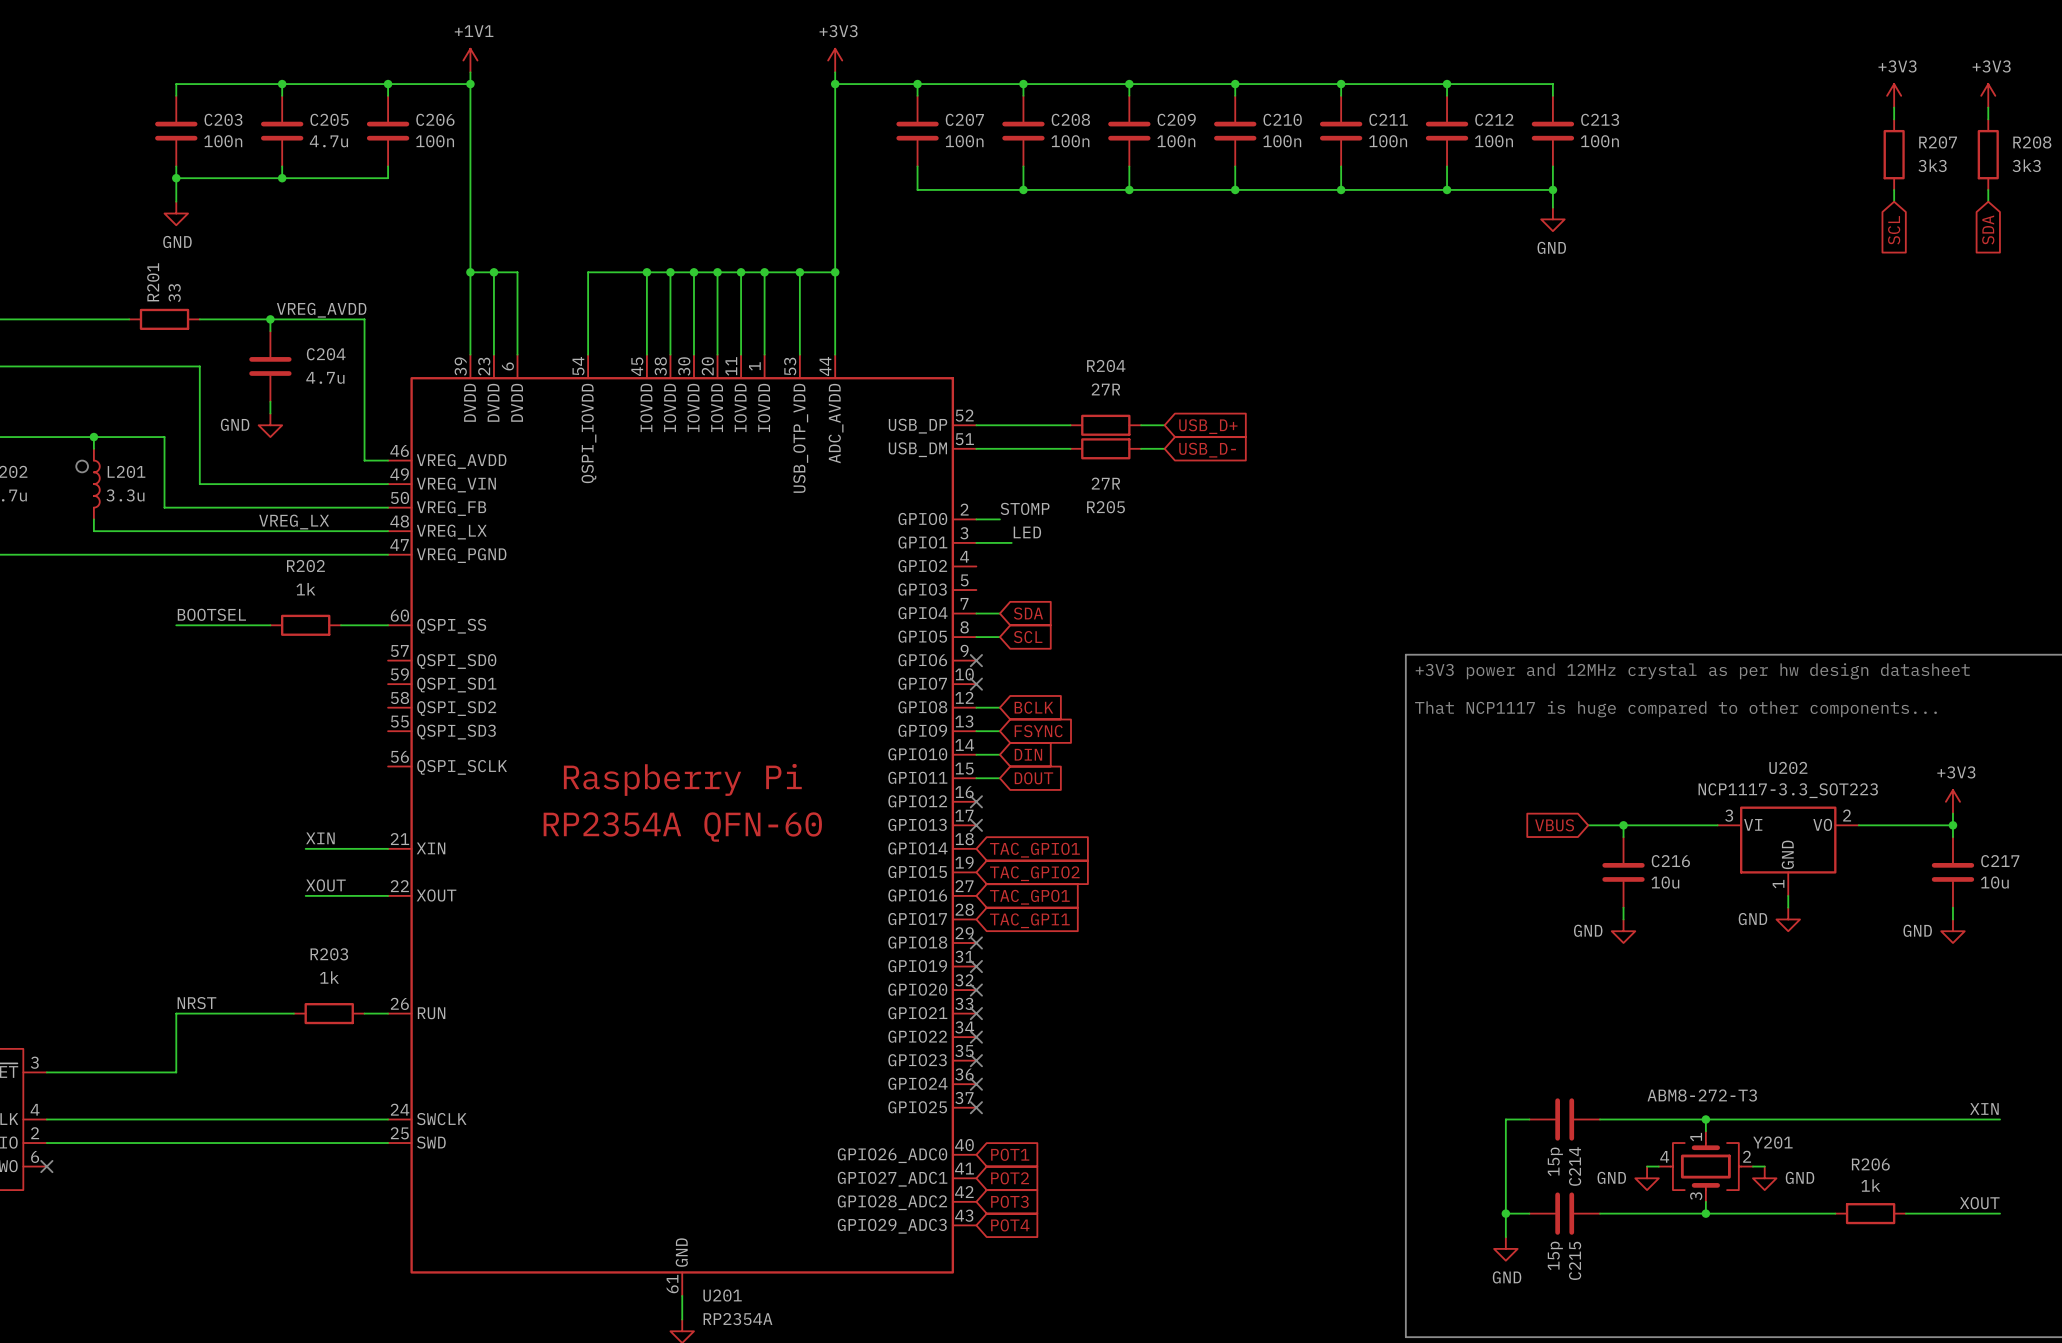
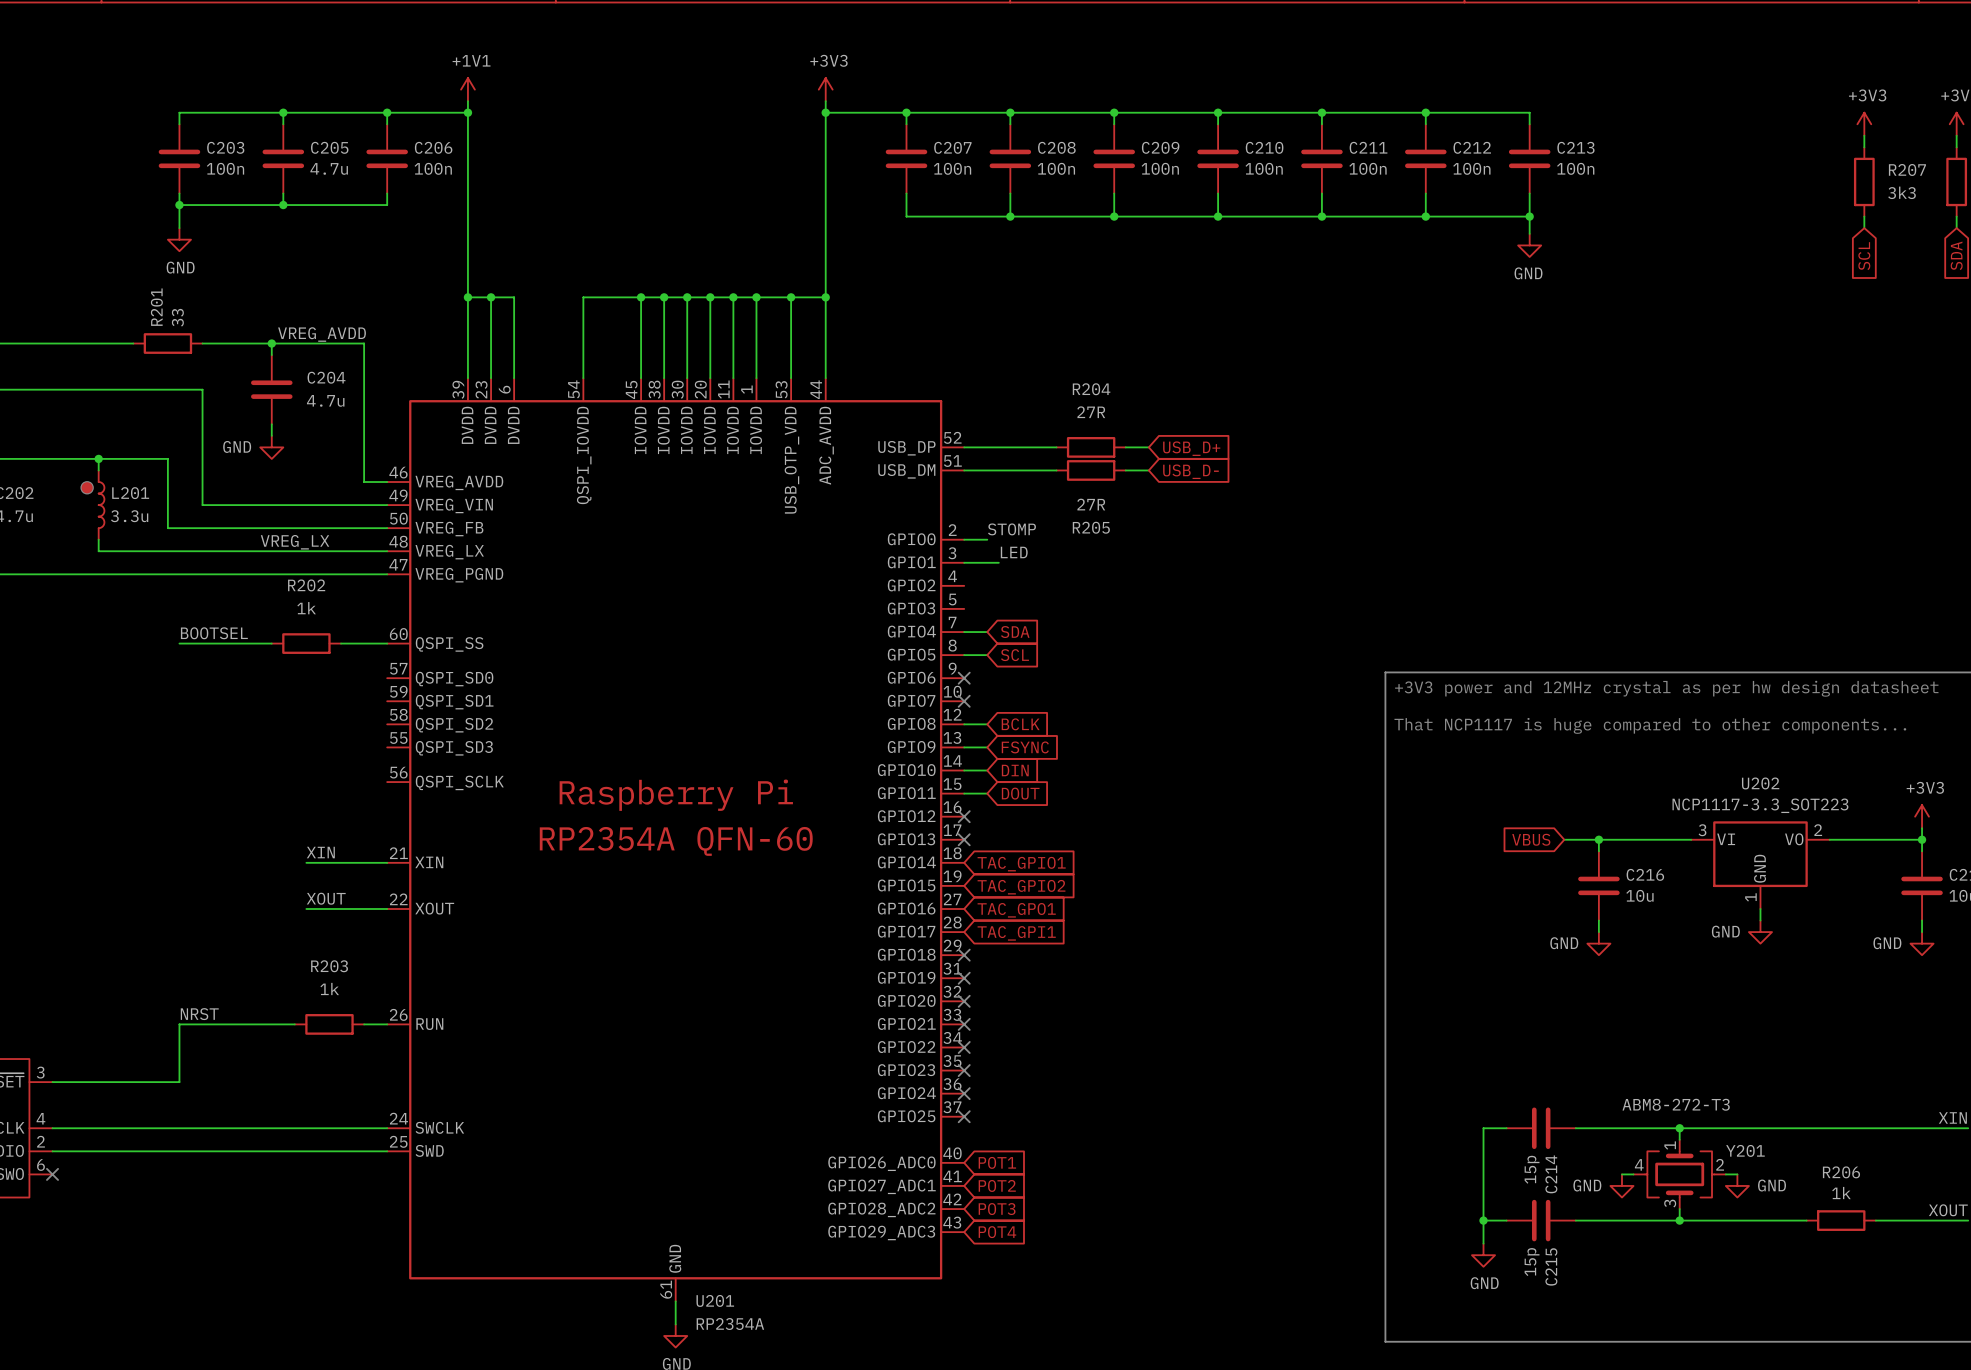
L201 symbol: [93, 448, 100, 520] -> [82, 470, 105, 540]

